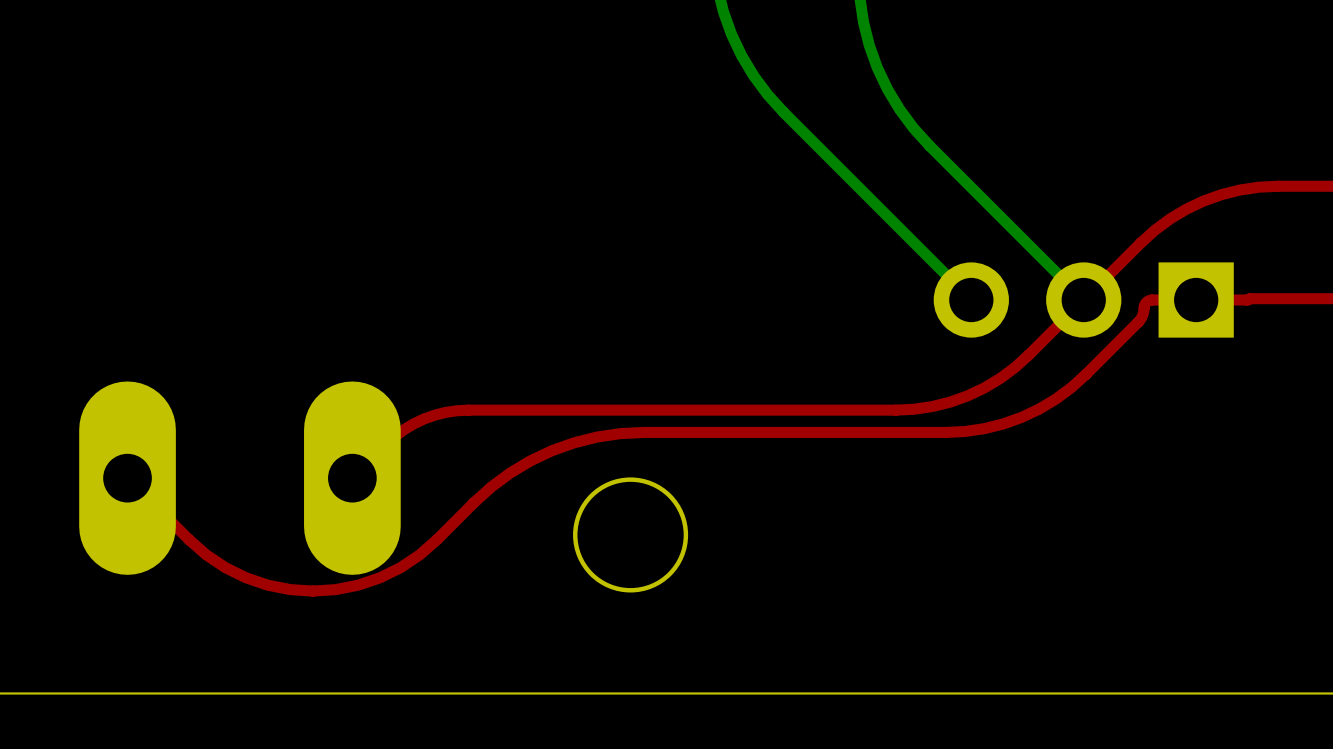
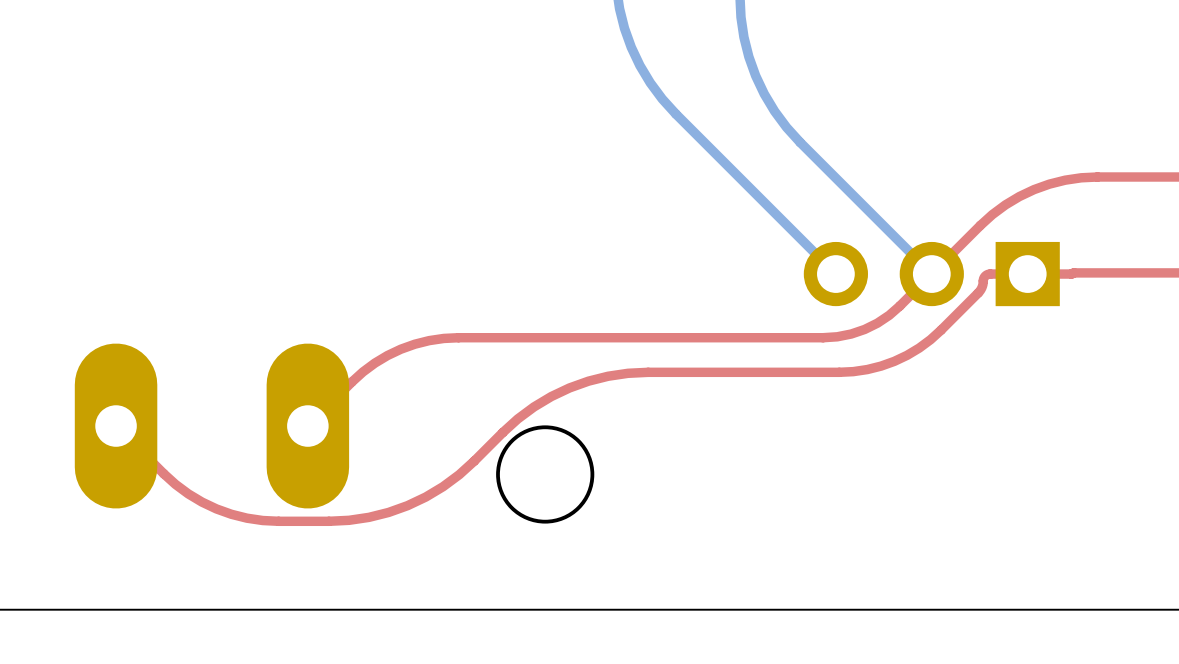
top track: (1046, 337) (1015, 367) (1000, 378) (967, 395) (932, 406) (895, 410) (457, 410) (424, 419) (403, 429) (386, 444) -> (899, 305) (877, 323) (864, 329) (837, 336) (458, 337) (429, 340) (400, 349) (374, 363) (336, 397)
top track: (1094, 365) (1071, 387) (1039, 409) (1003, 423) (965, 431) (644, 432) (620, 433) (574, 442) (530, 460) (510, 473) (491, 487) (419, 554) (400, 567) (380, 577) (335, 589) (290, 589) (245, 577) (206, 554) (183, 534) -> (941, 330) (919, 348) (894, 361) (853, 371) (648, 372) (627, 373) (588, 381) (569, 387) (533, 406) (517, 418) (474, 461) (443, 486) (407, 505) (369, 517) (328, 521) (278, 521) (246, 518) (216, 508) (202, 502) (175, 484) (163, 473)

